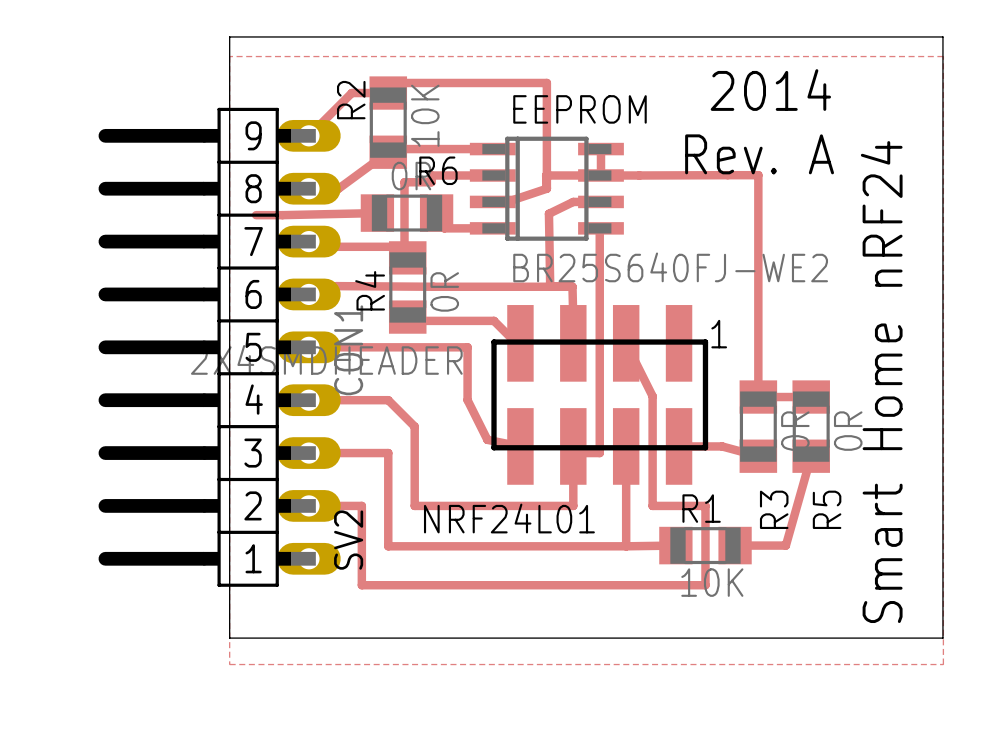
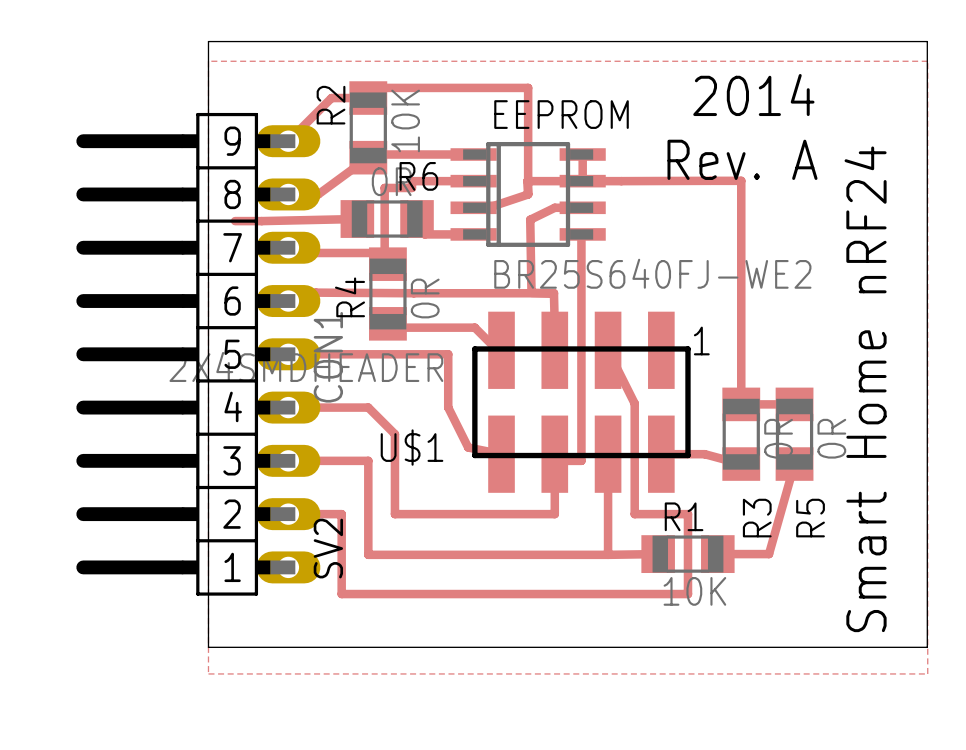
NRF24L01 name: NRF24L01 (509, 518) -> U$1 (412, 447)

